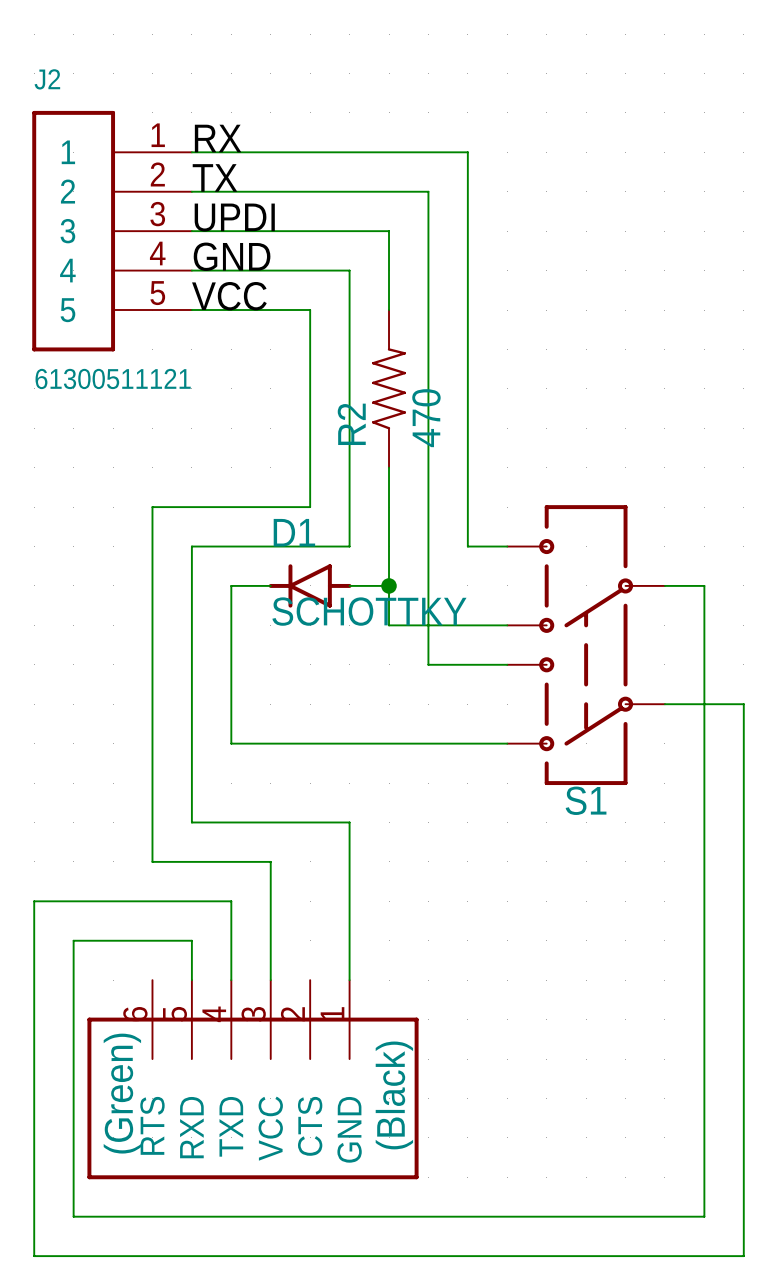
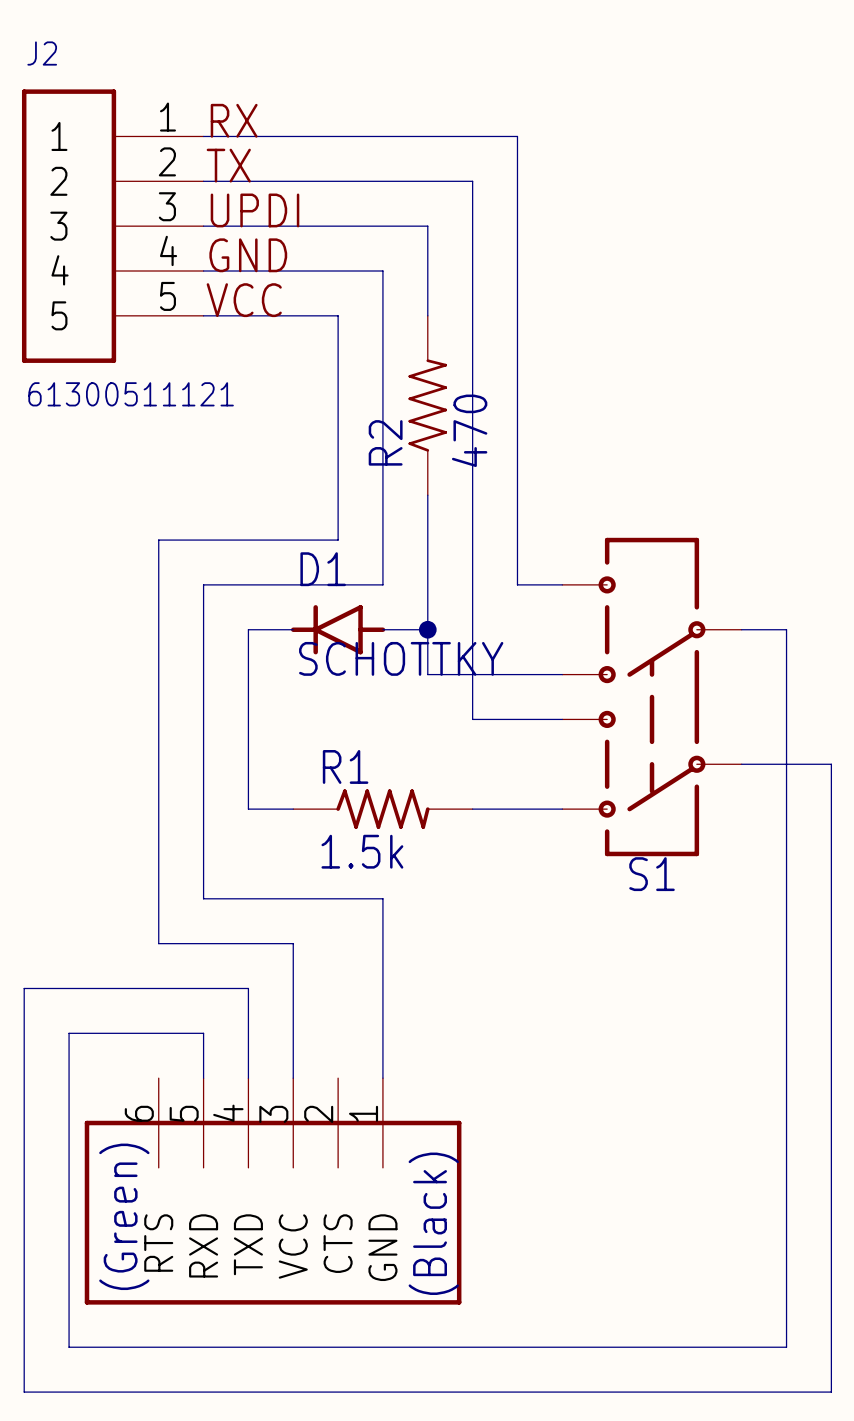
R1: none -> 1.5k (382, 809)

